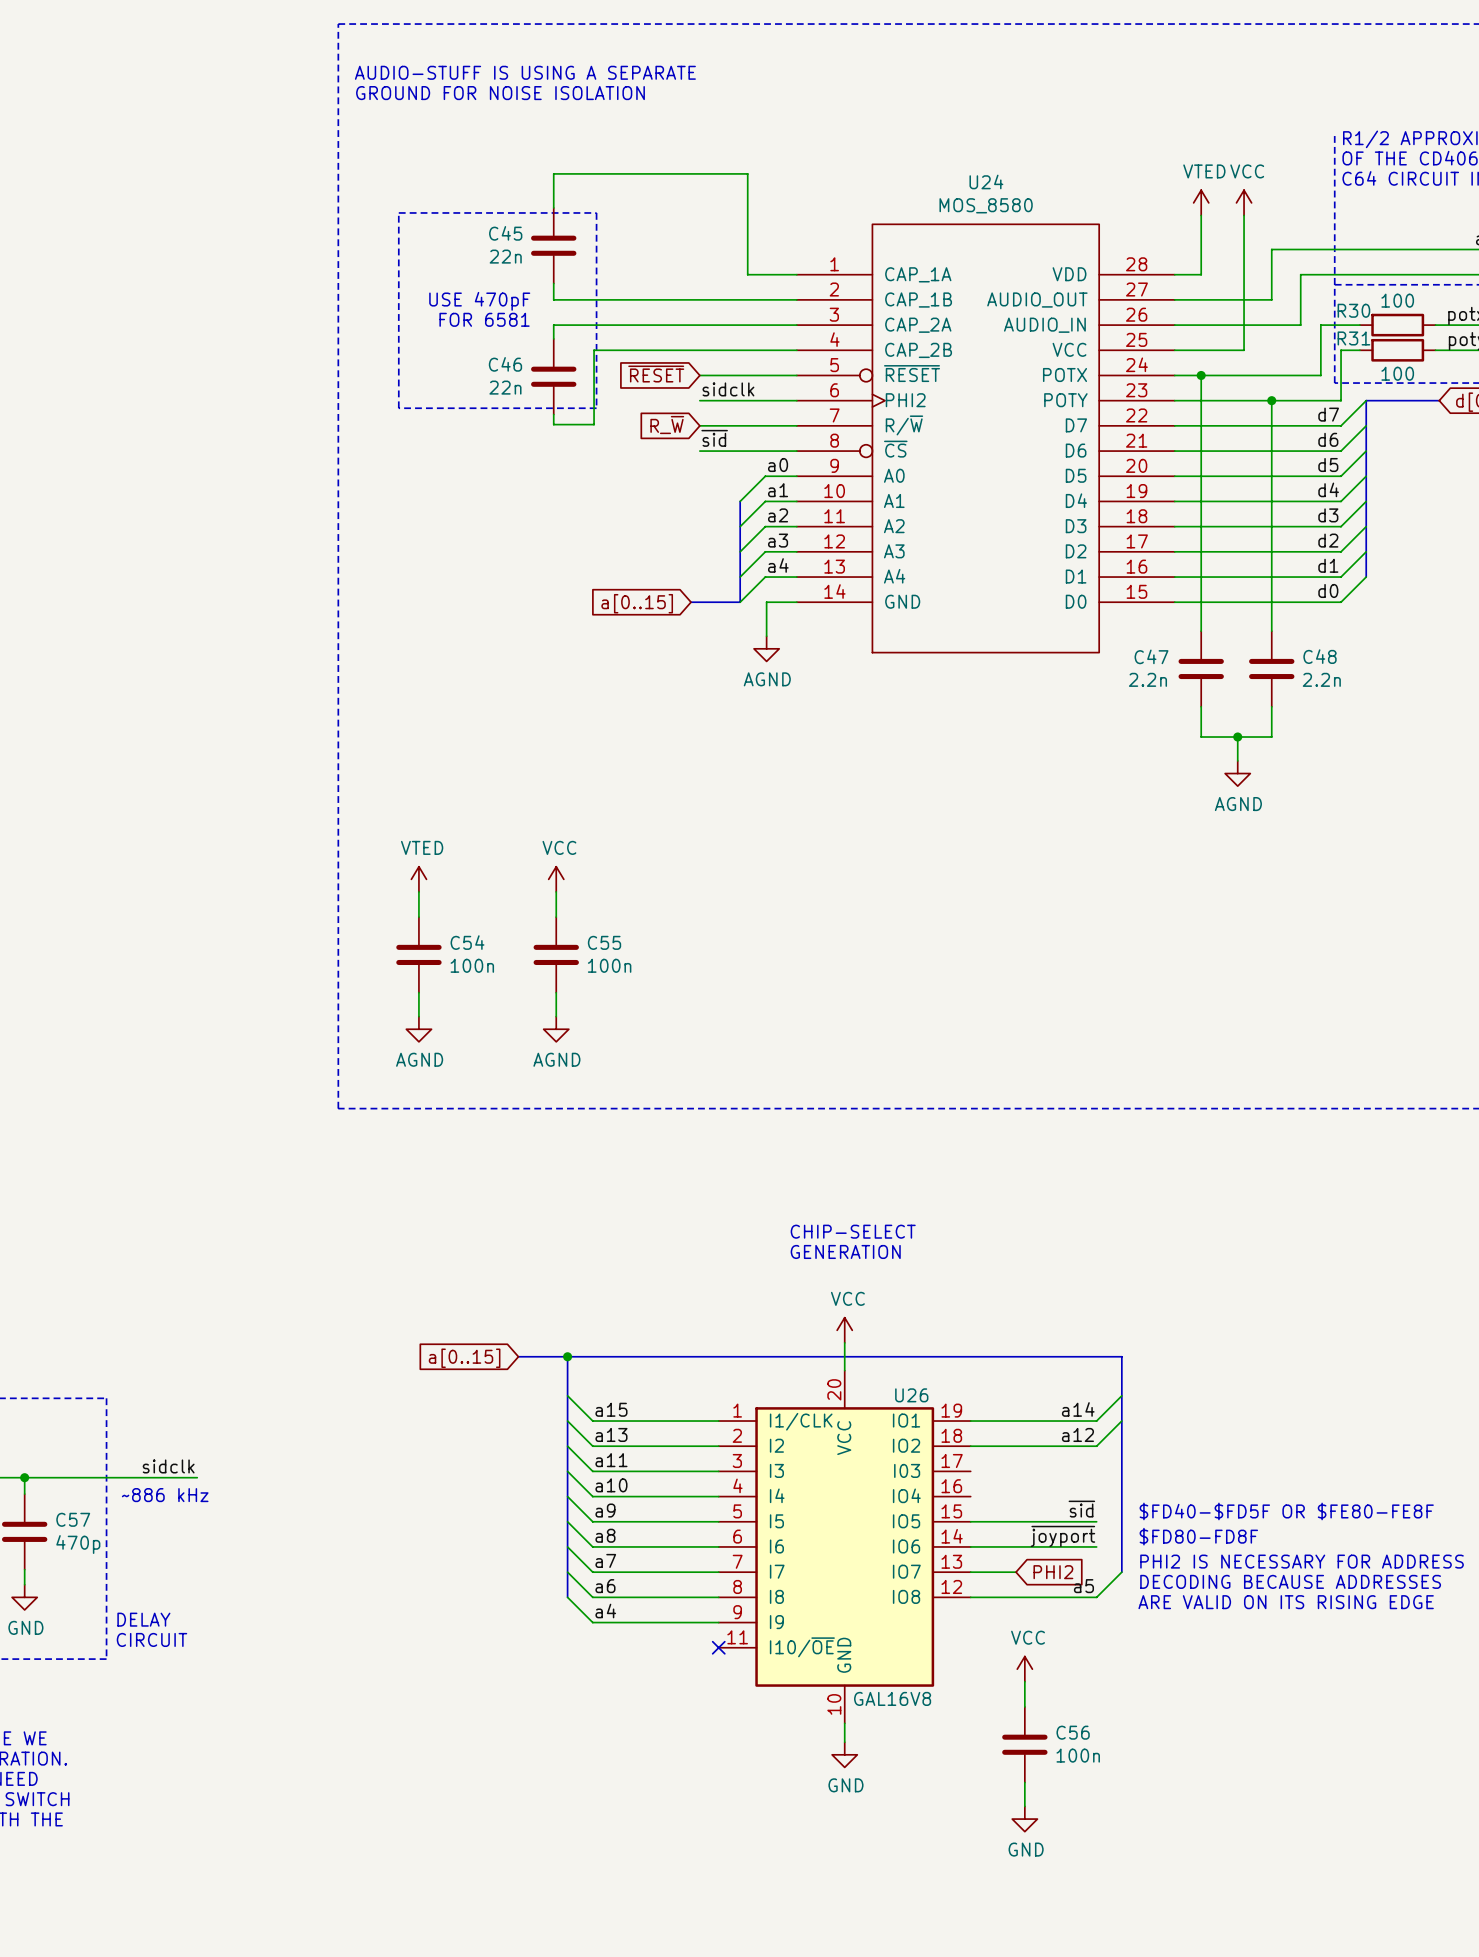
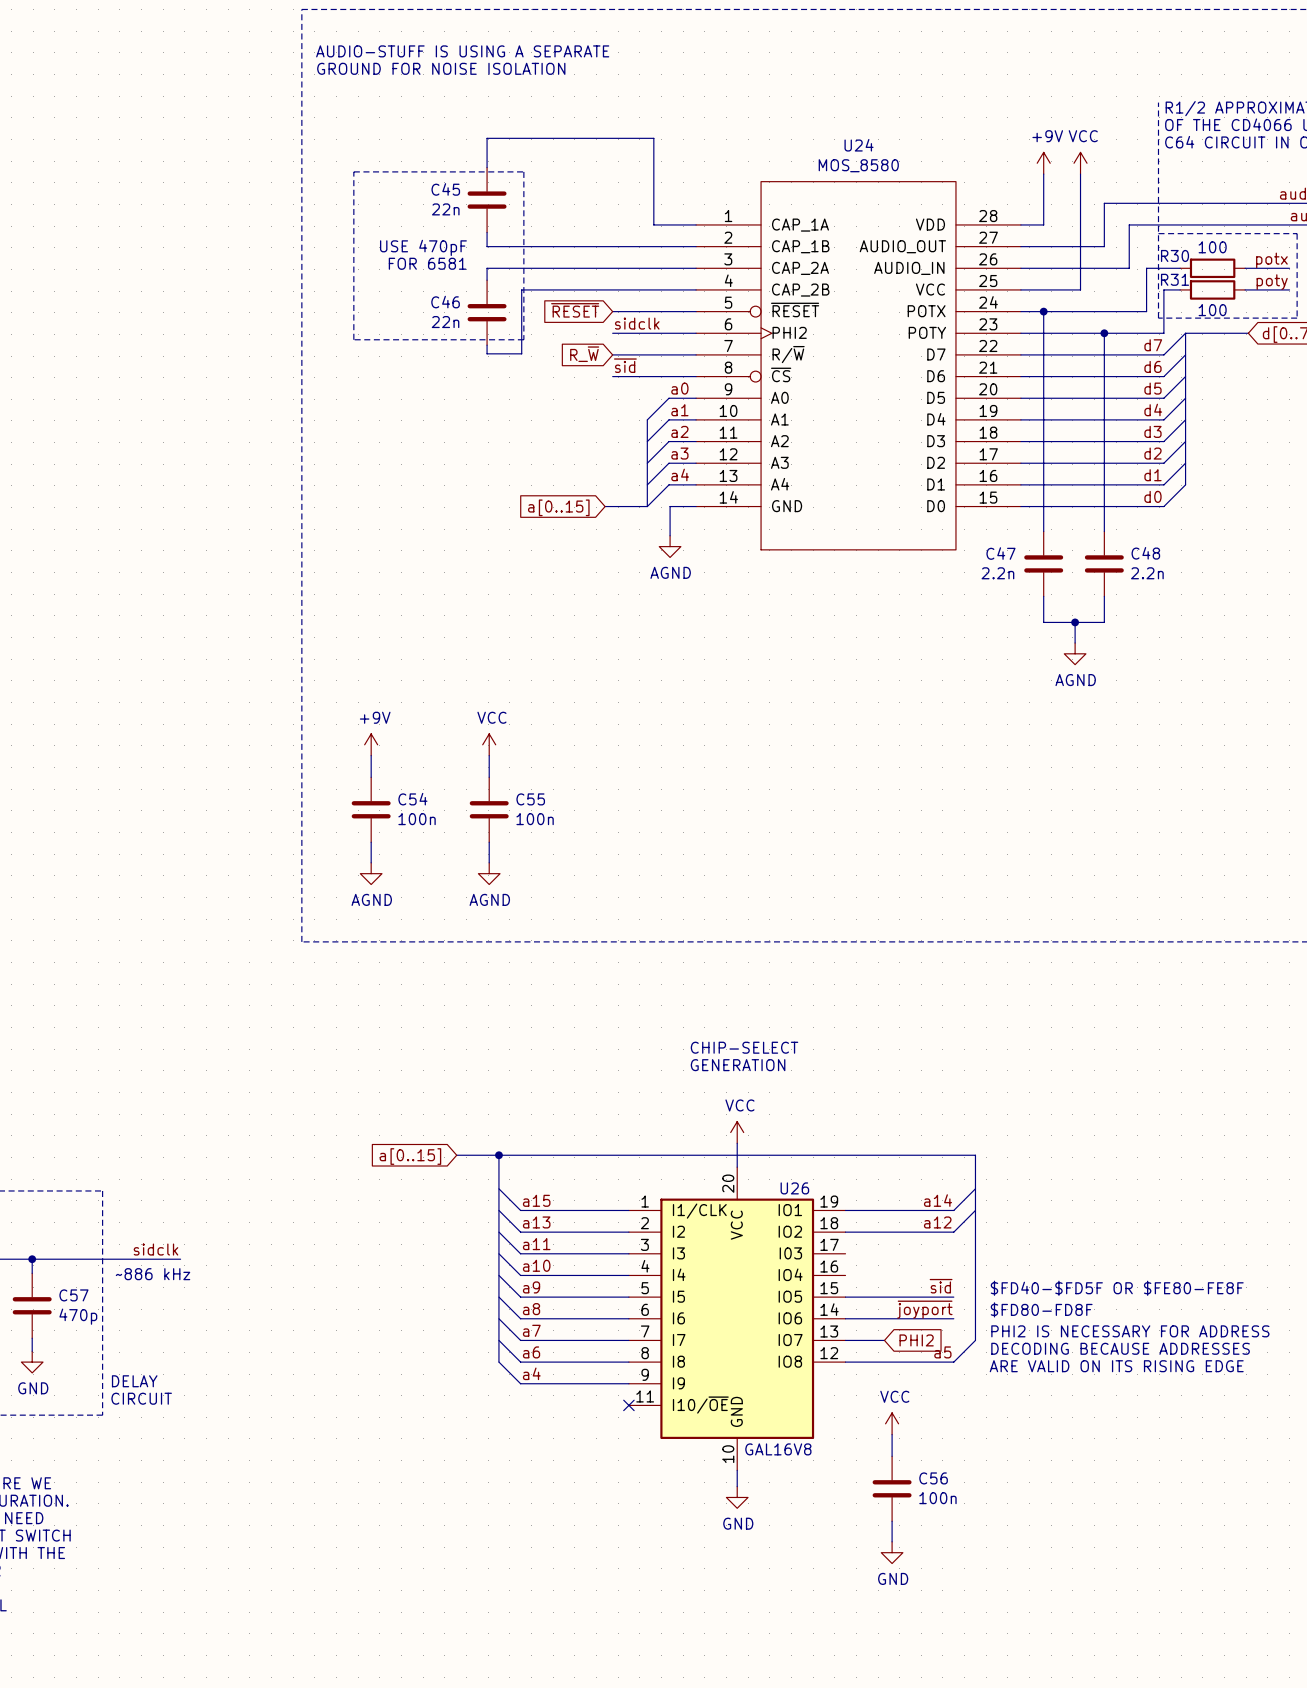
power symbol: VTED (1201, 202) -> +9V (1043, 163)
power symbol: VTED (418, 879) -> +9V (371, 744)

